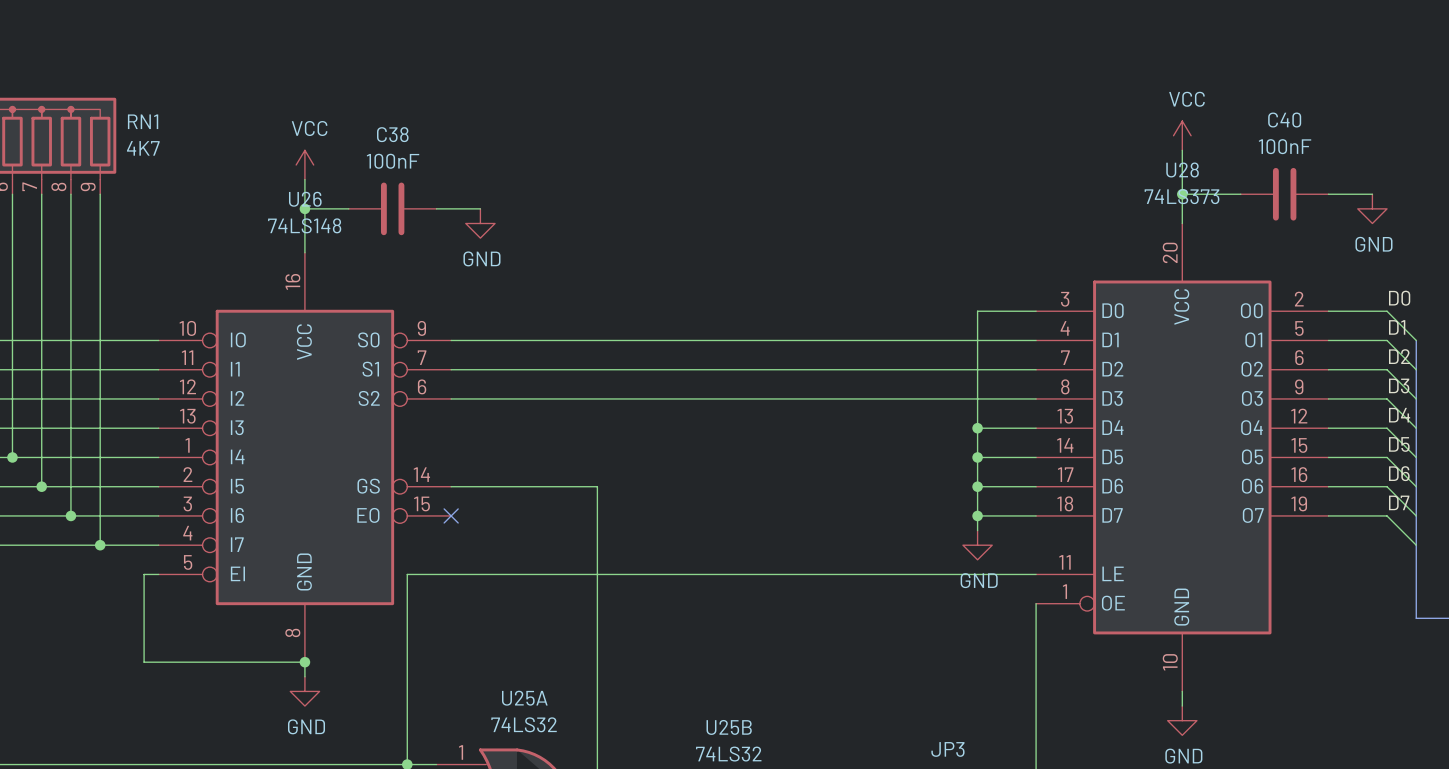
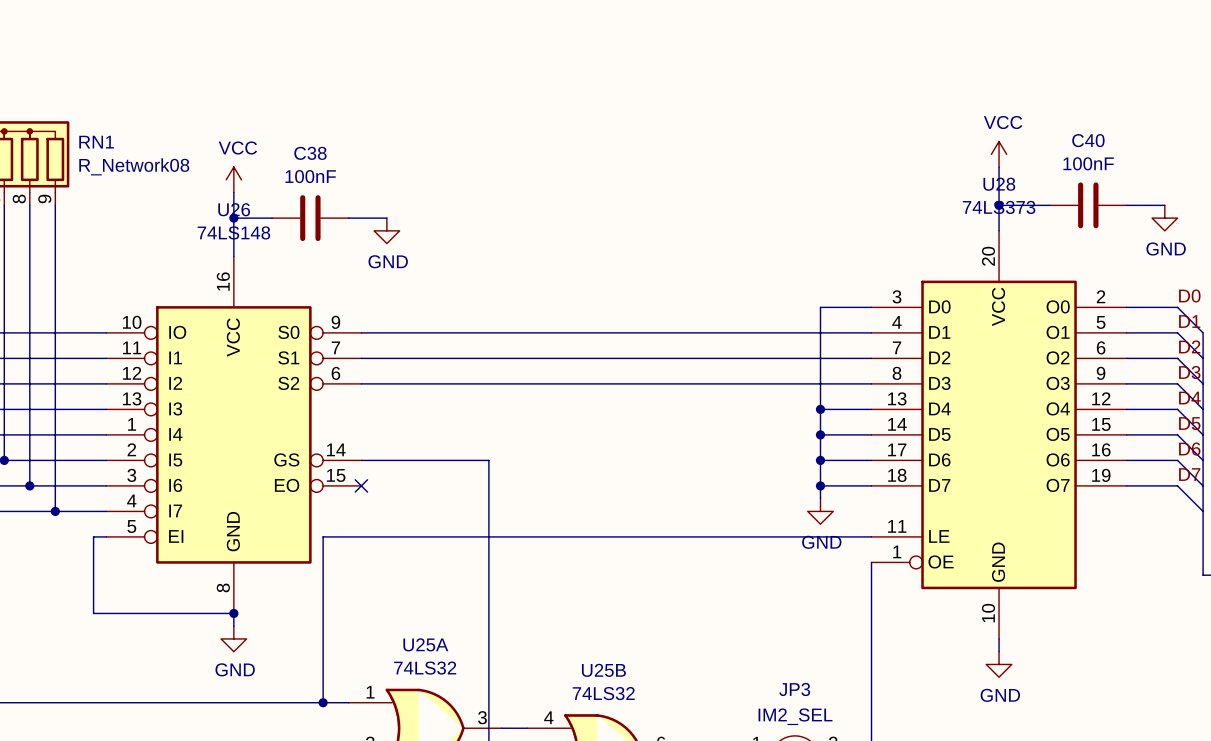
RN1 value: 4K7 (143, 148) -> R_Network08 (134, 166)

